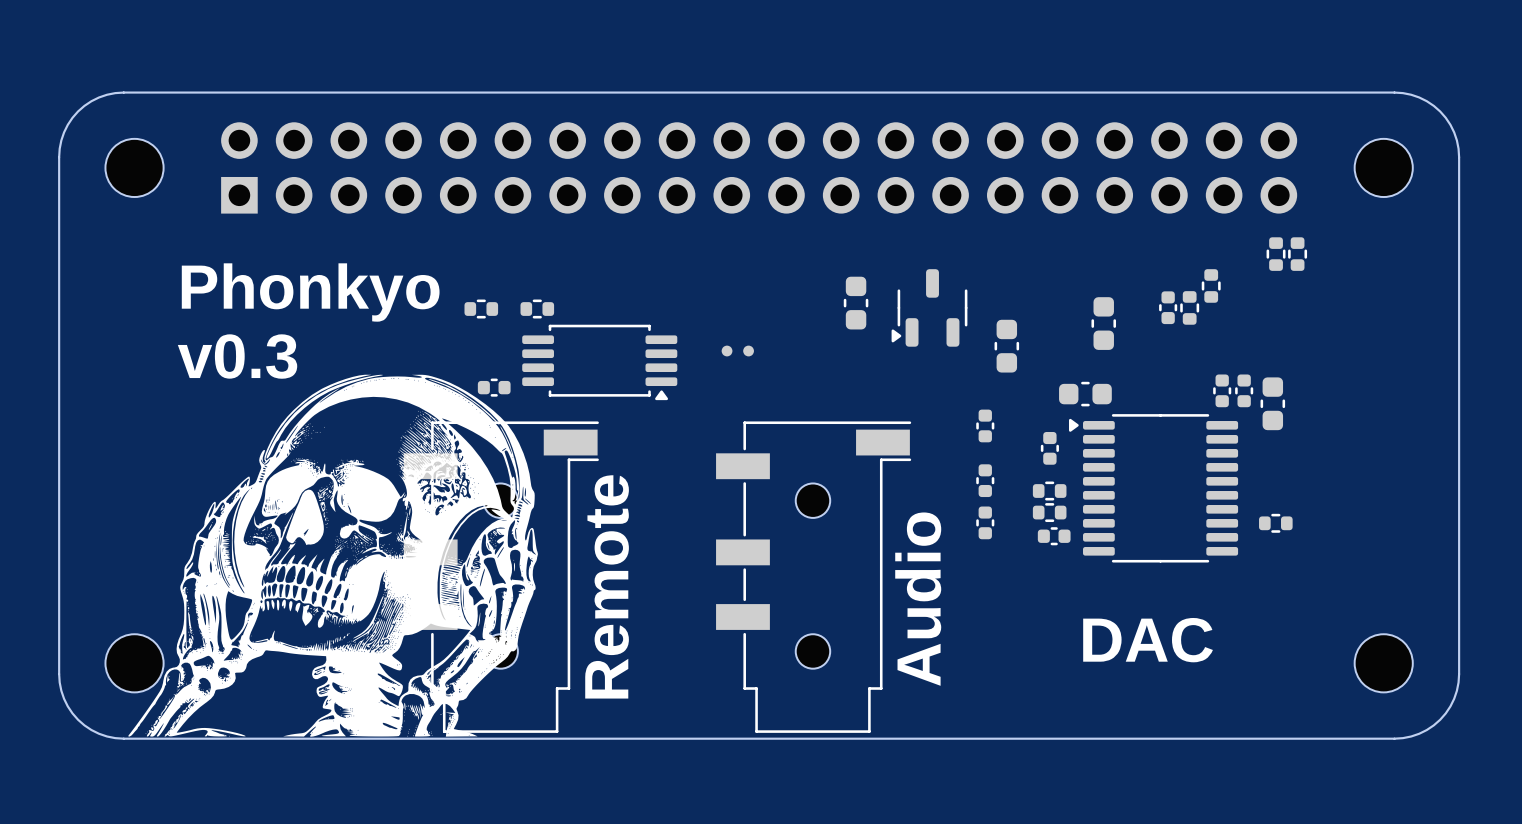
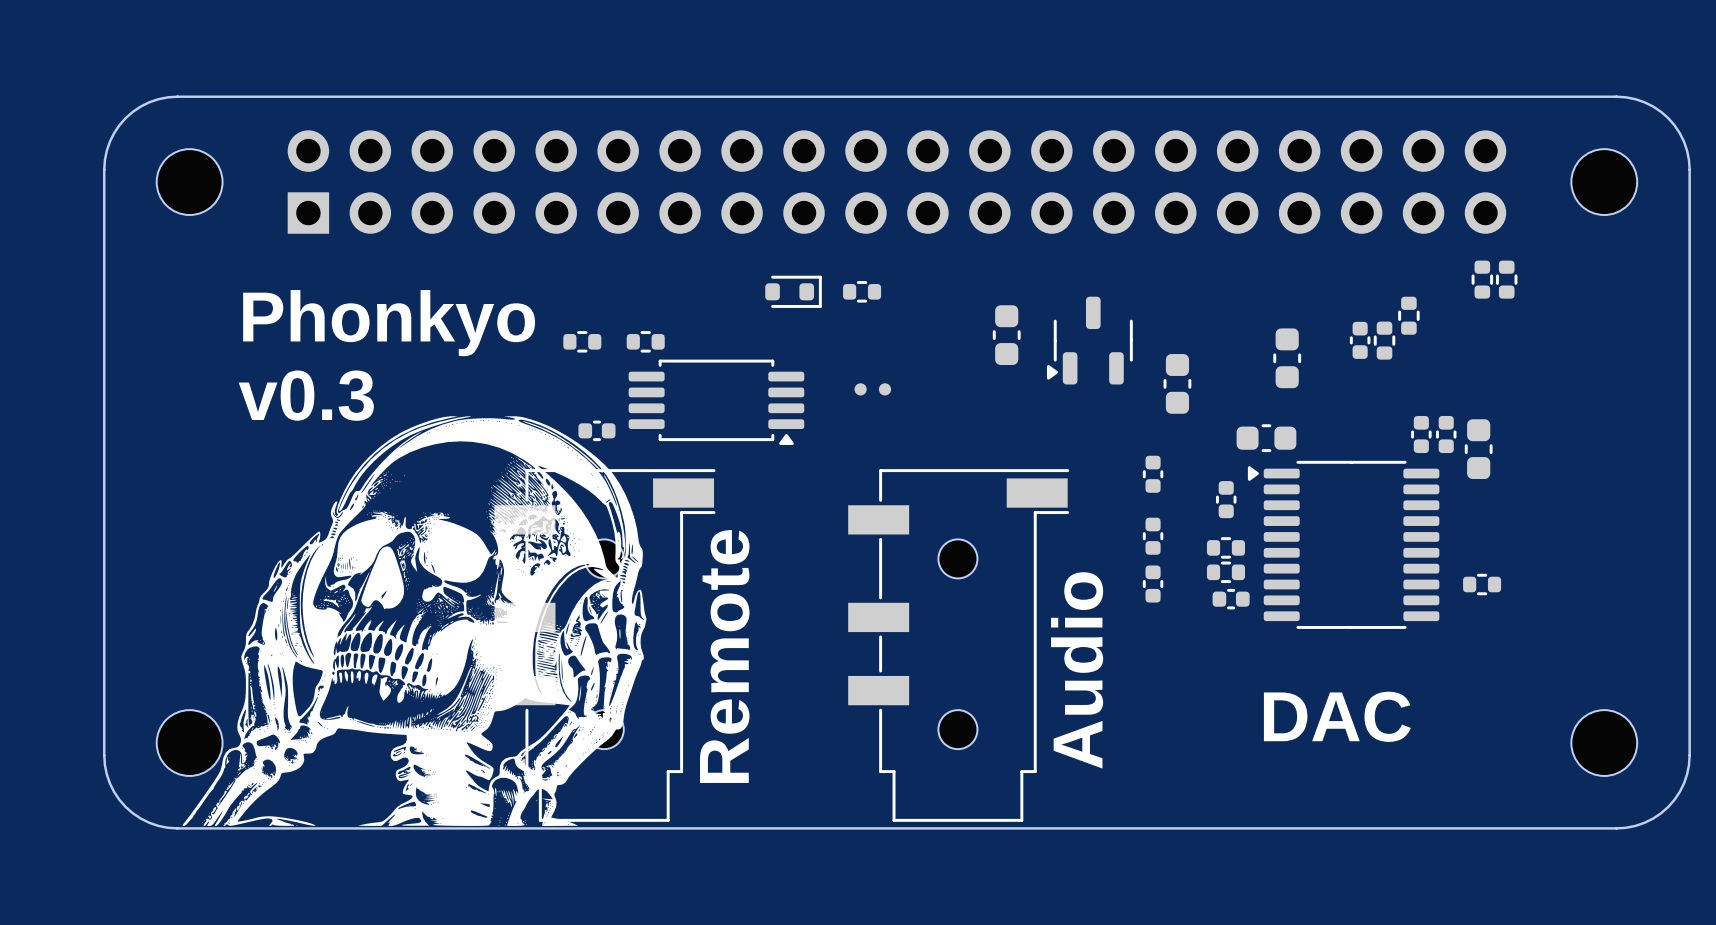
part: none -> (793, 291)
part: none -> (862, 291)

